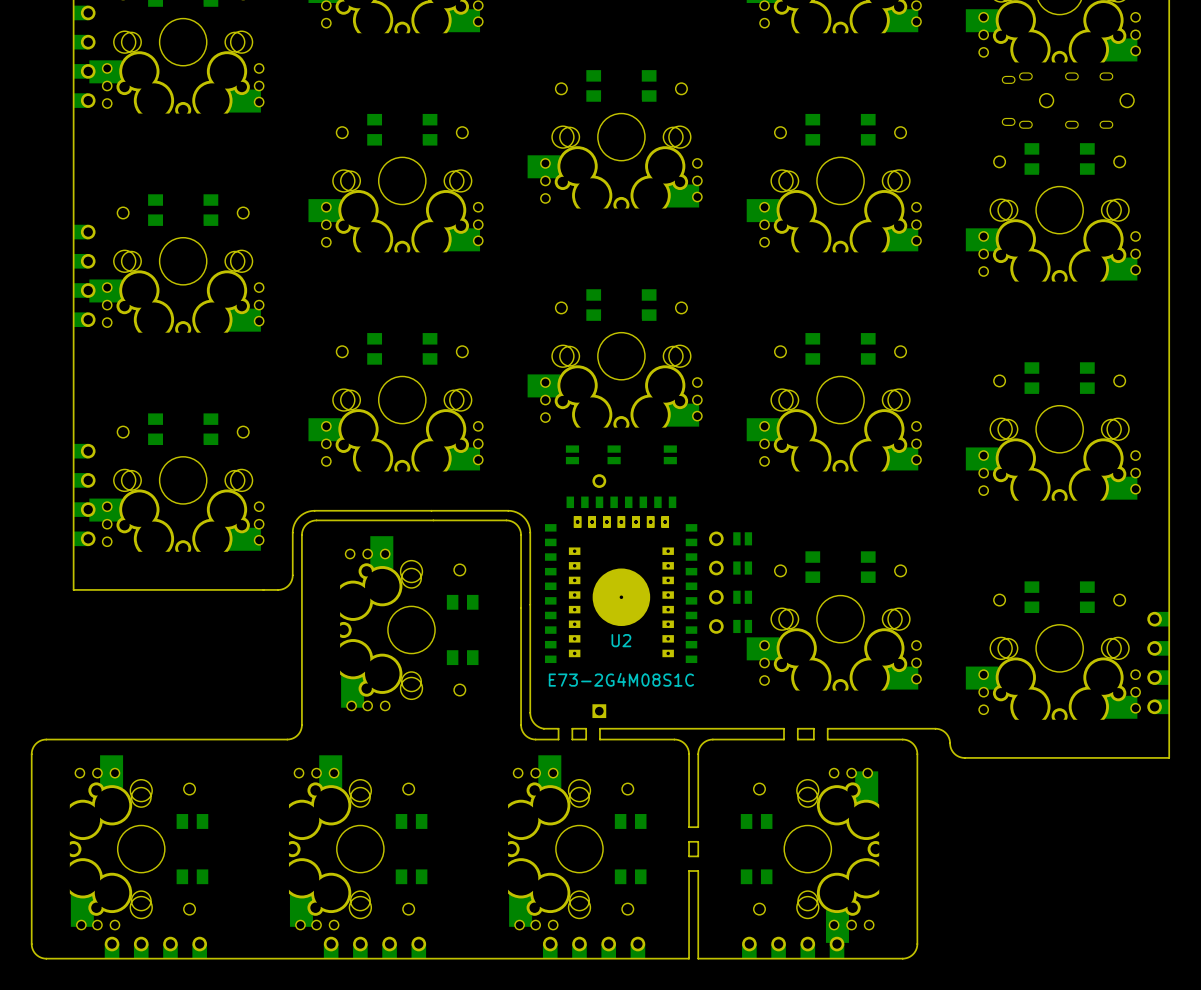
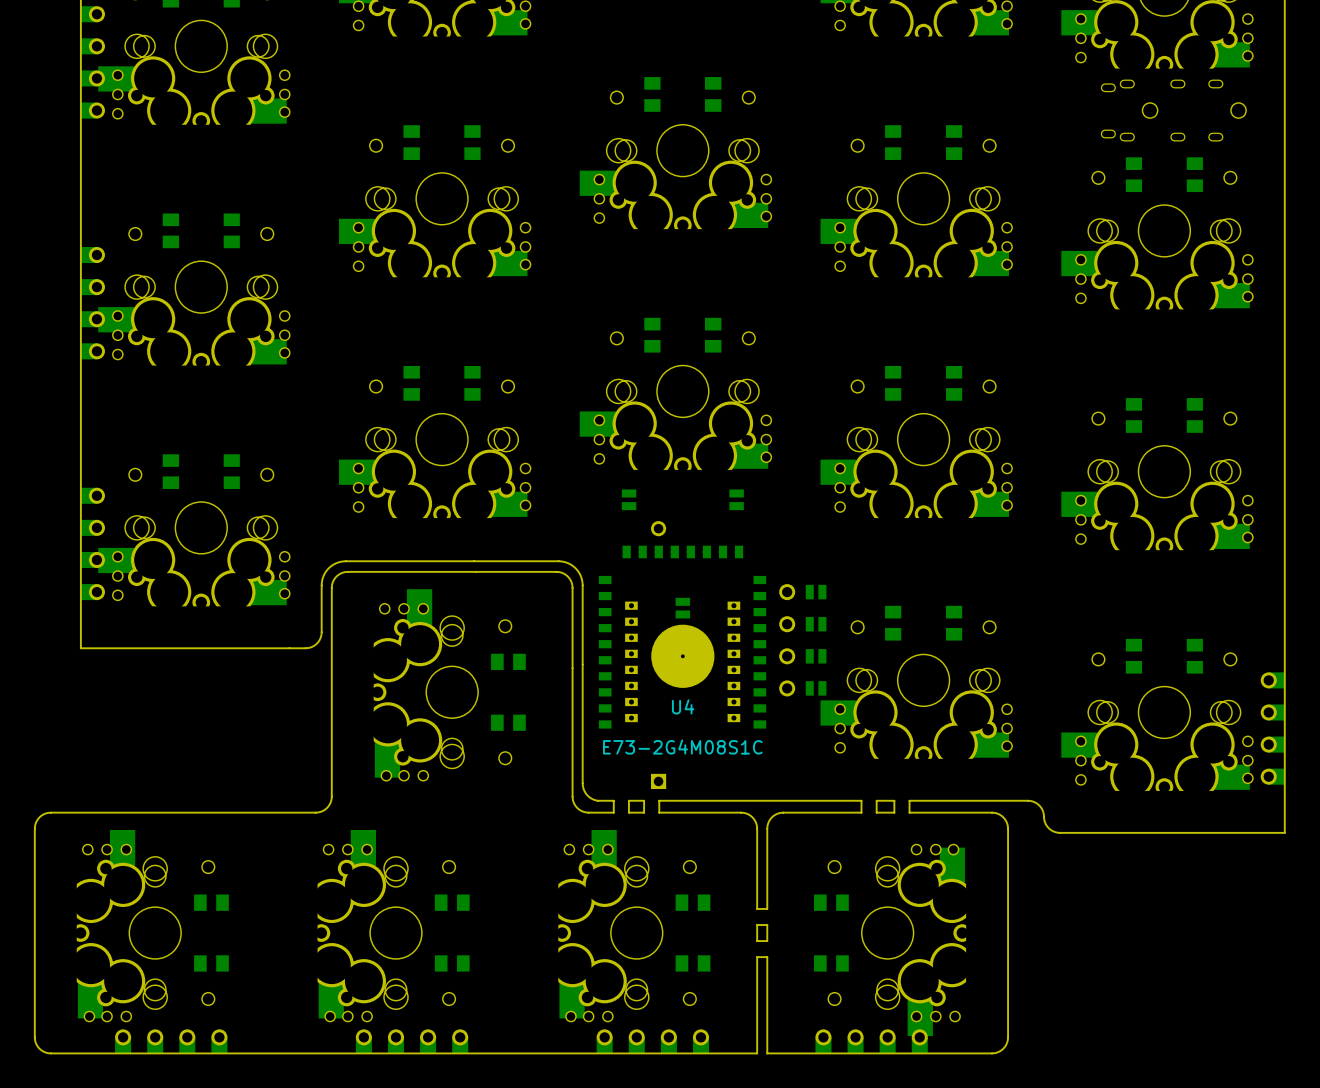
part position: (614, 454) -> (682, 608)
U2: (621, 579) -> none
U4: none -> (682, 637)
part: (623, 586) -> none
part: none -> (733, 661)

